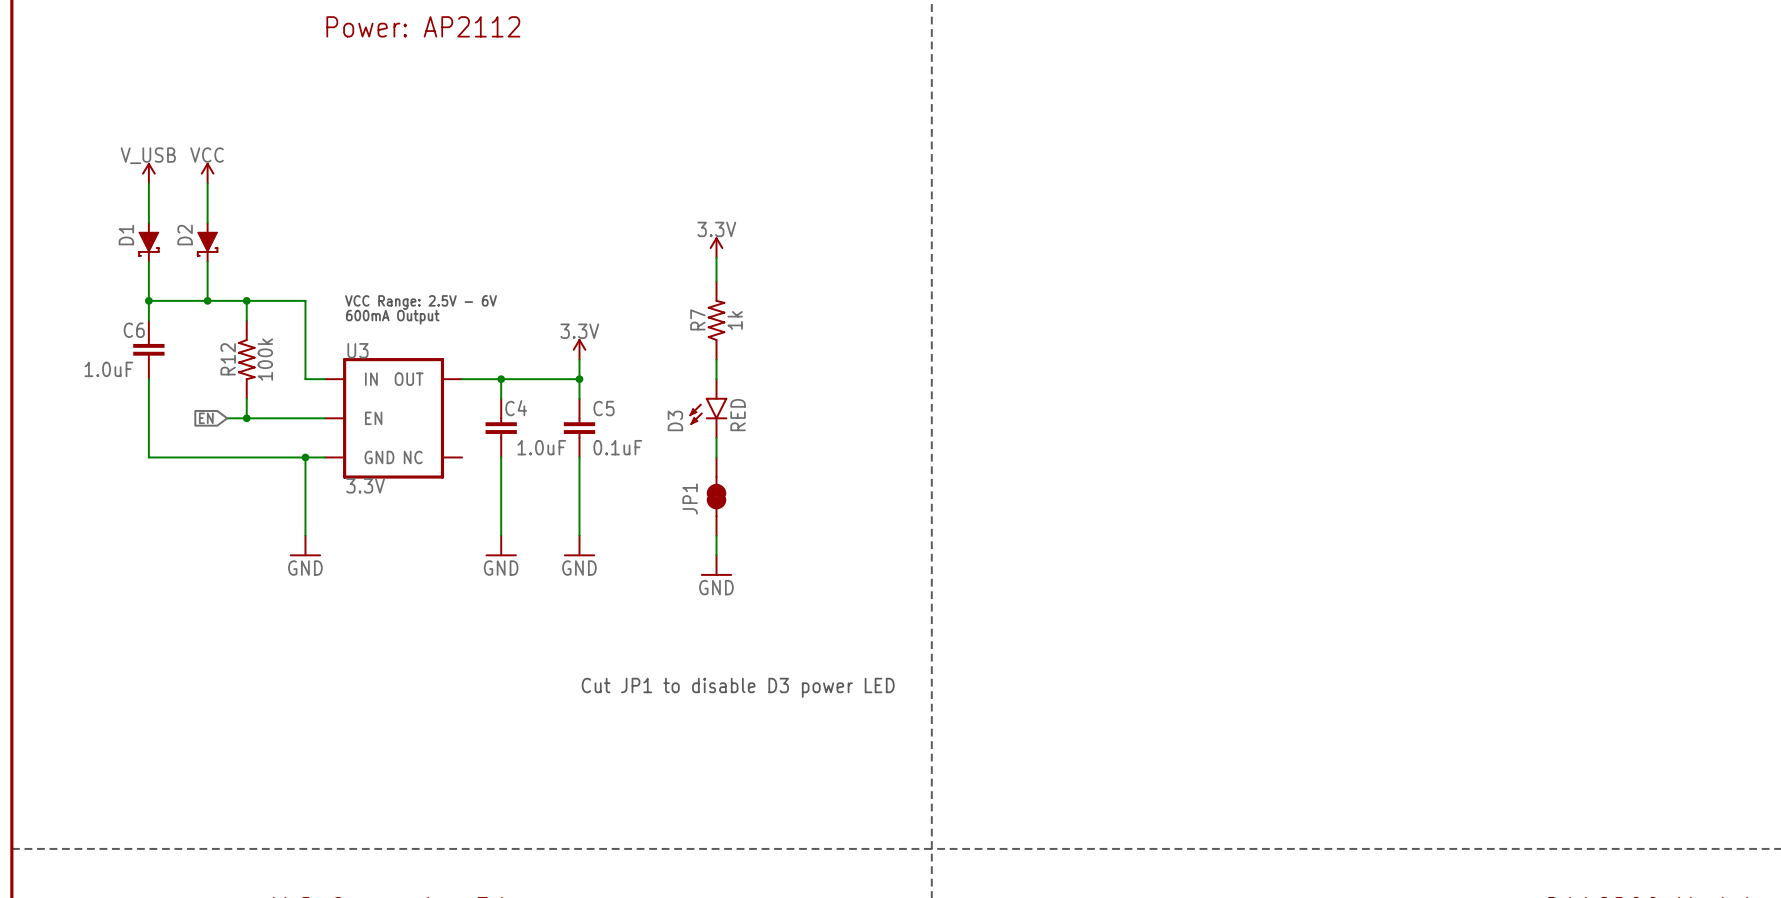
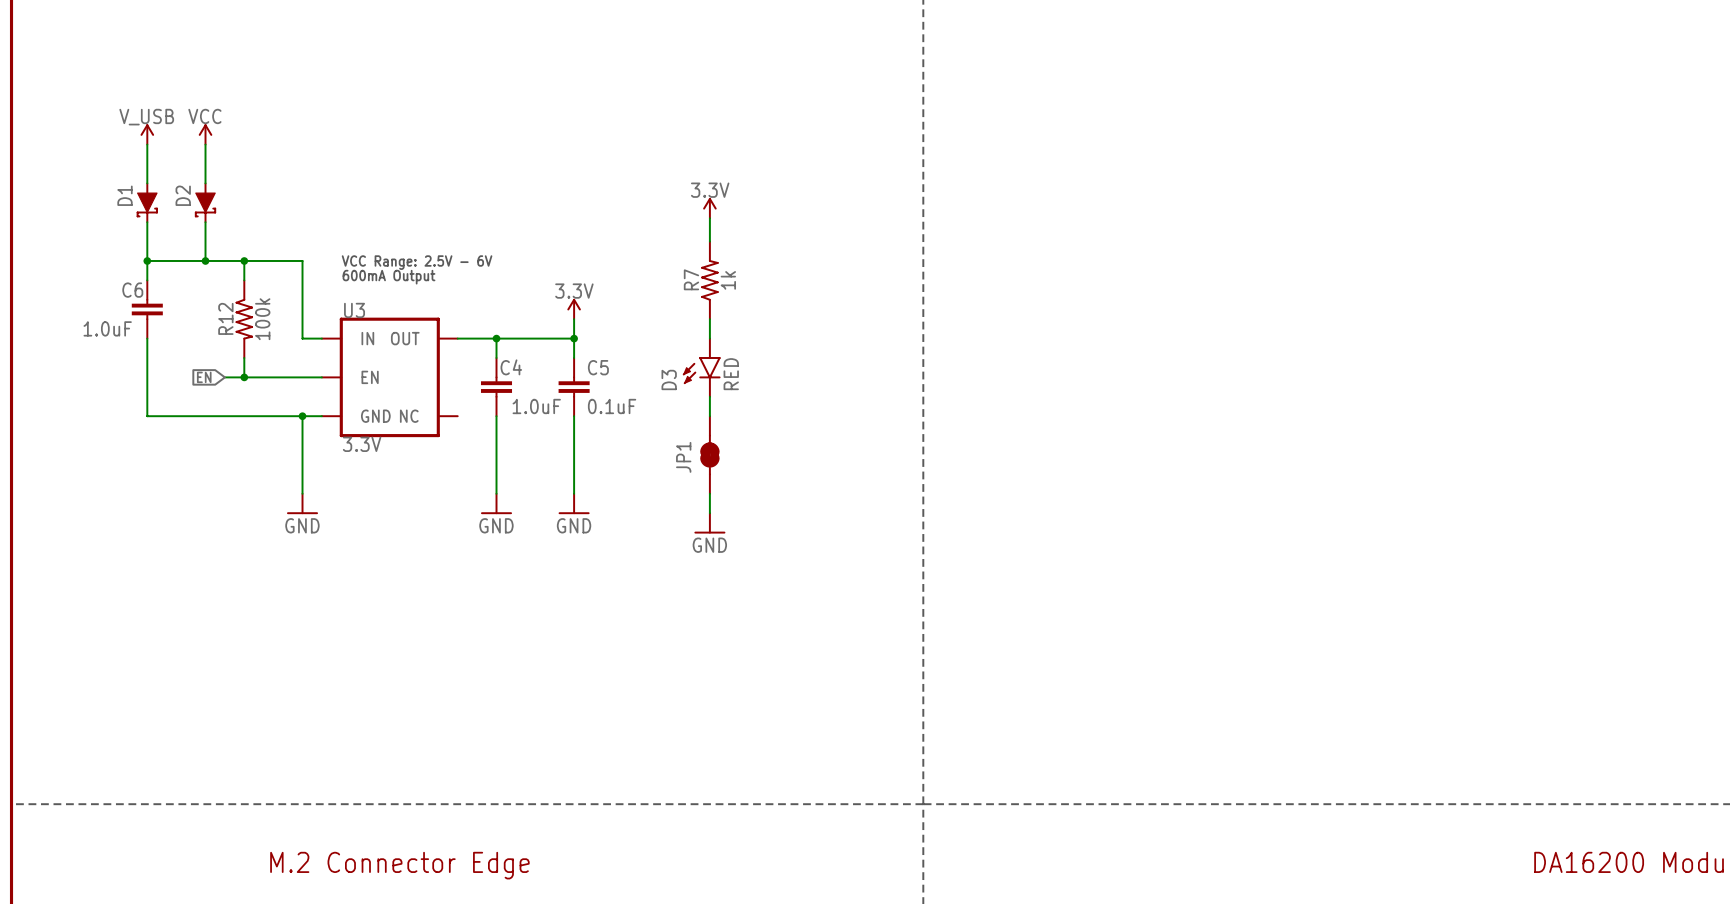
text: Cut JP1 to disable D3 power LED (738, 687) -> none

